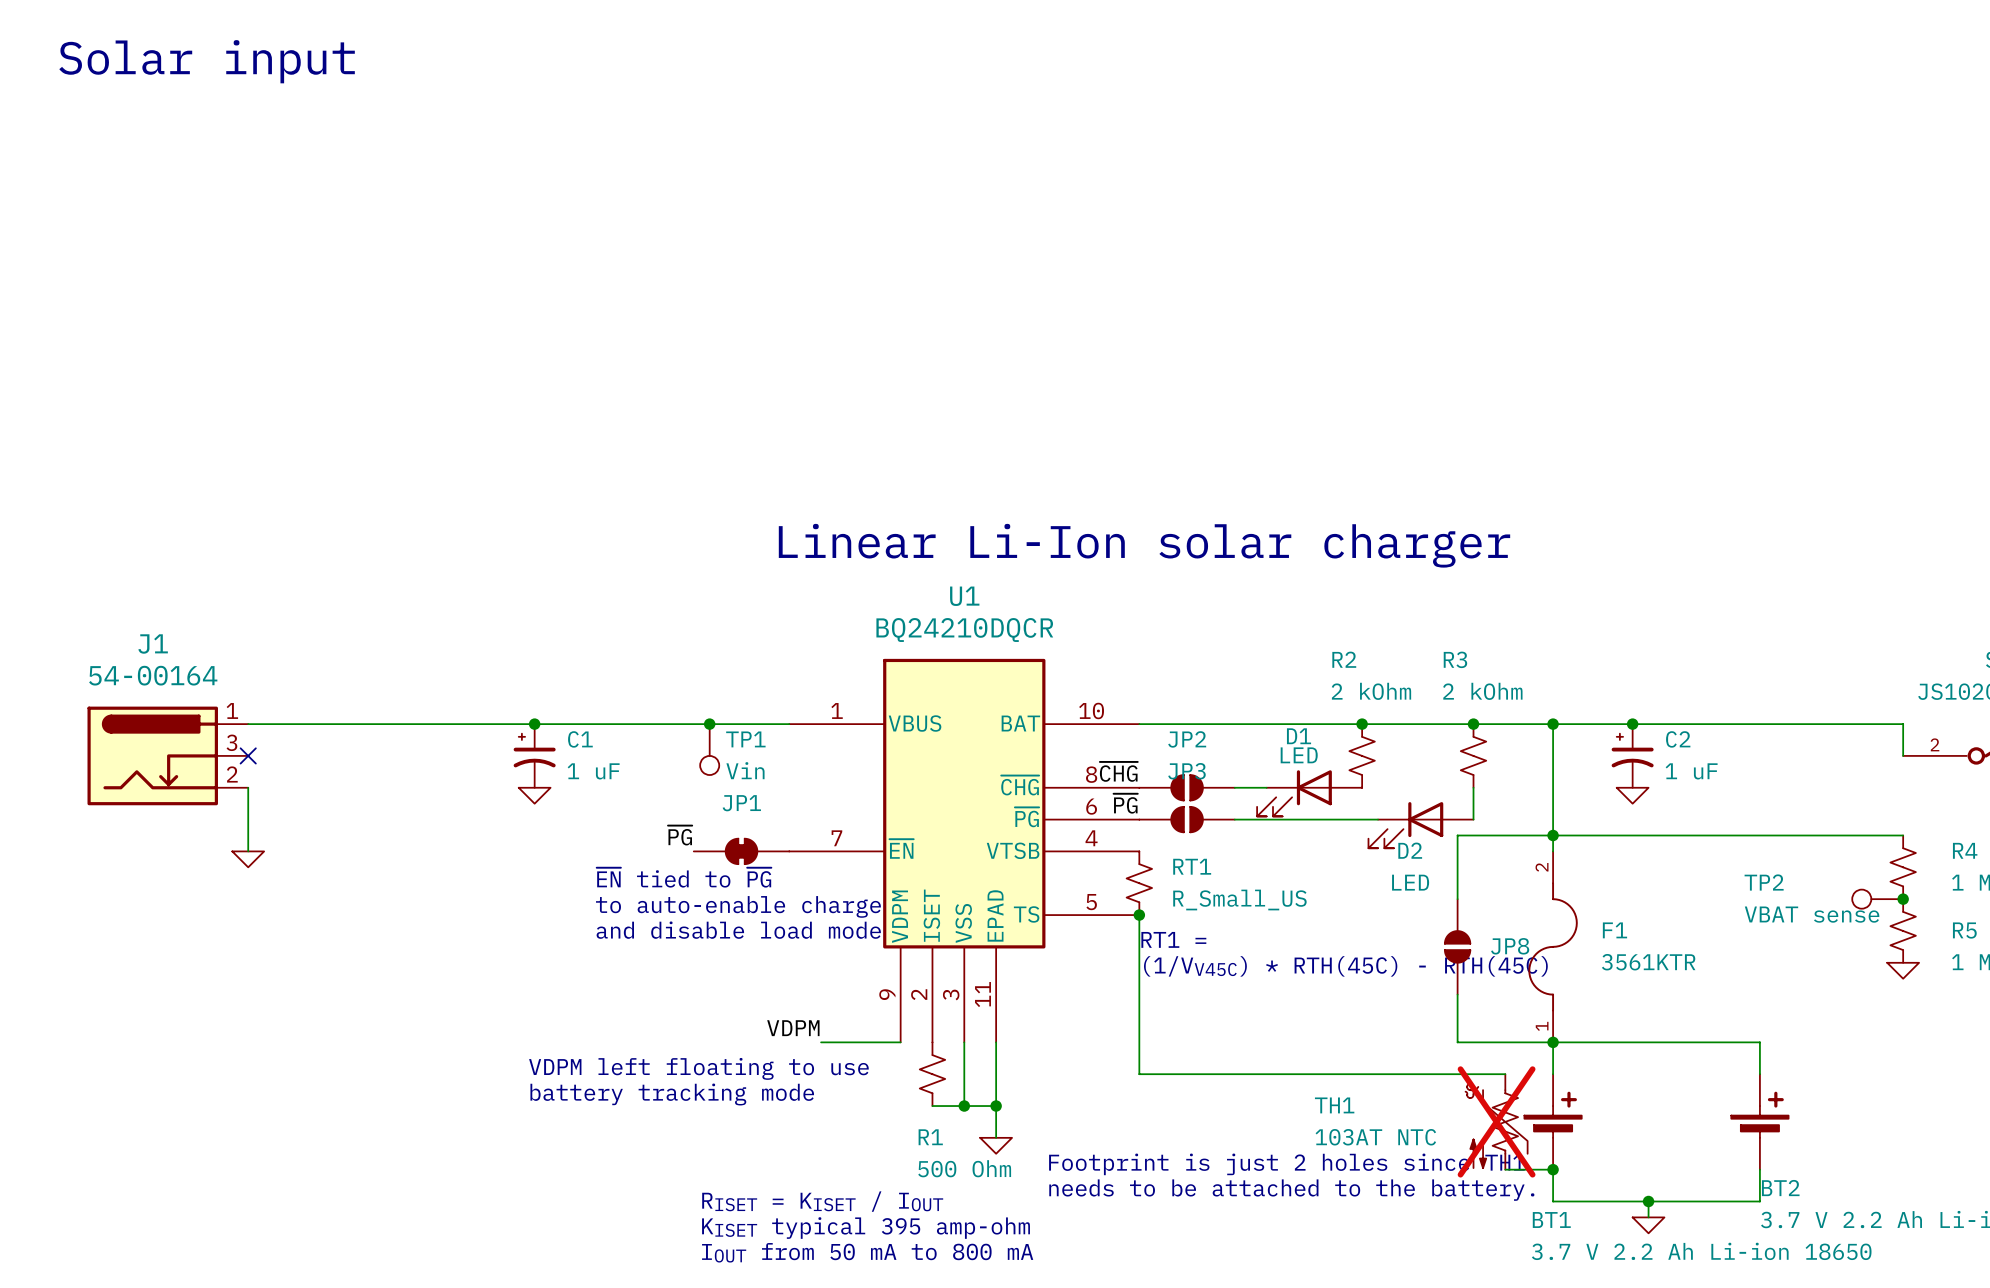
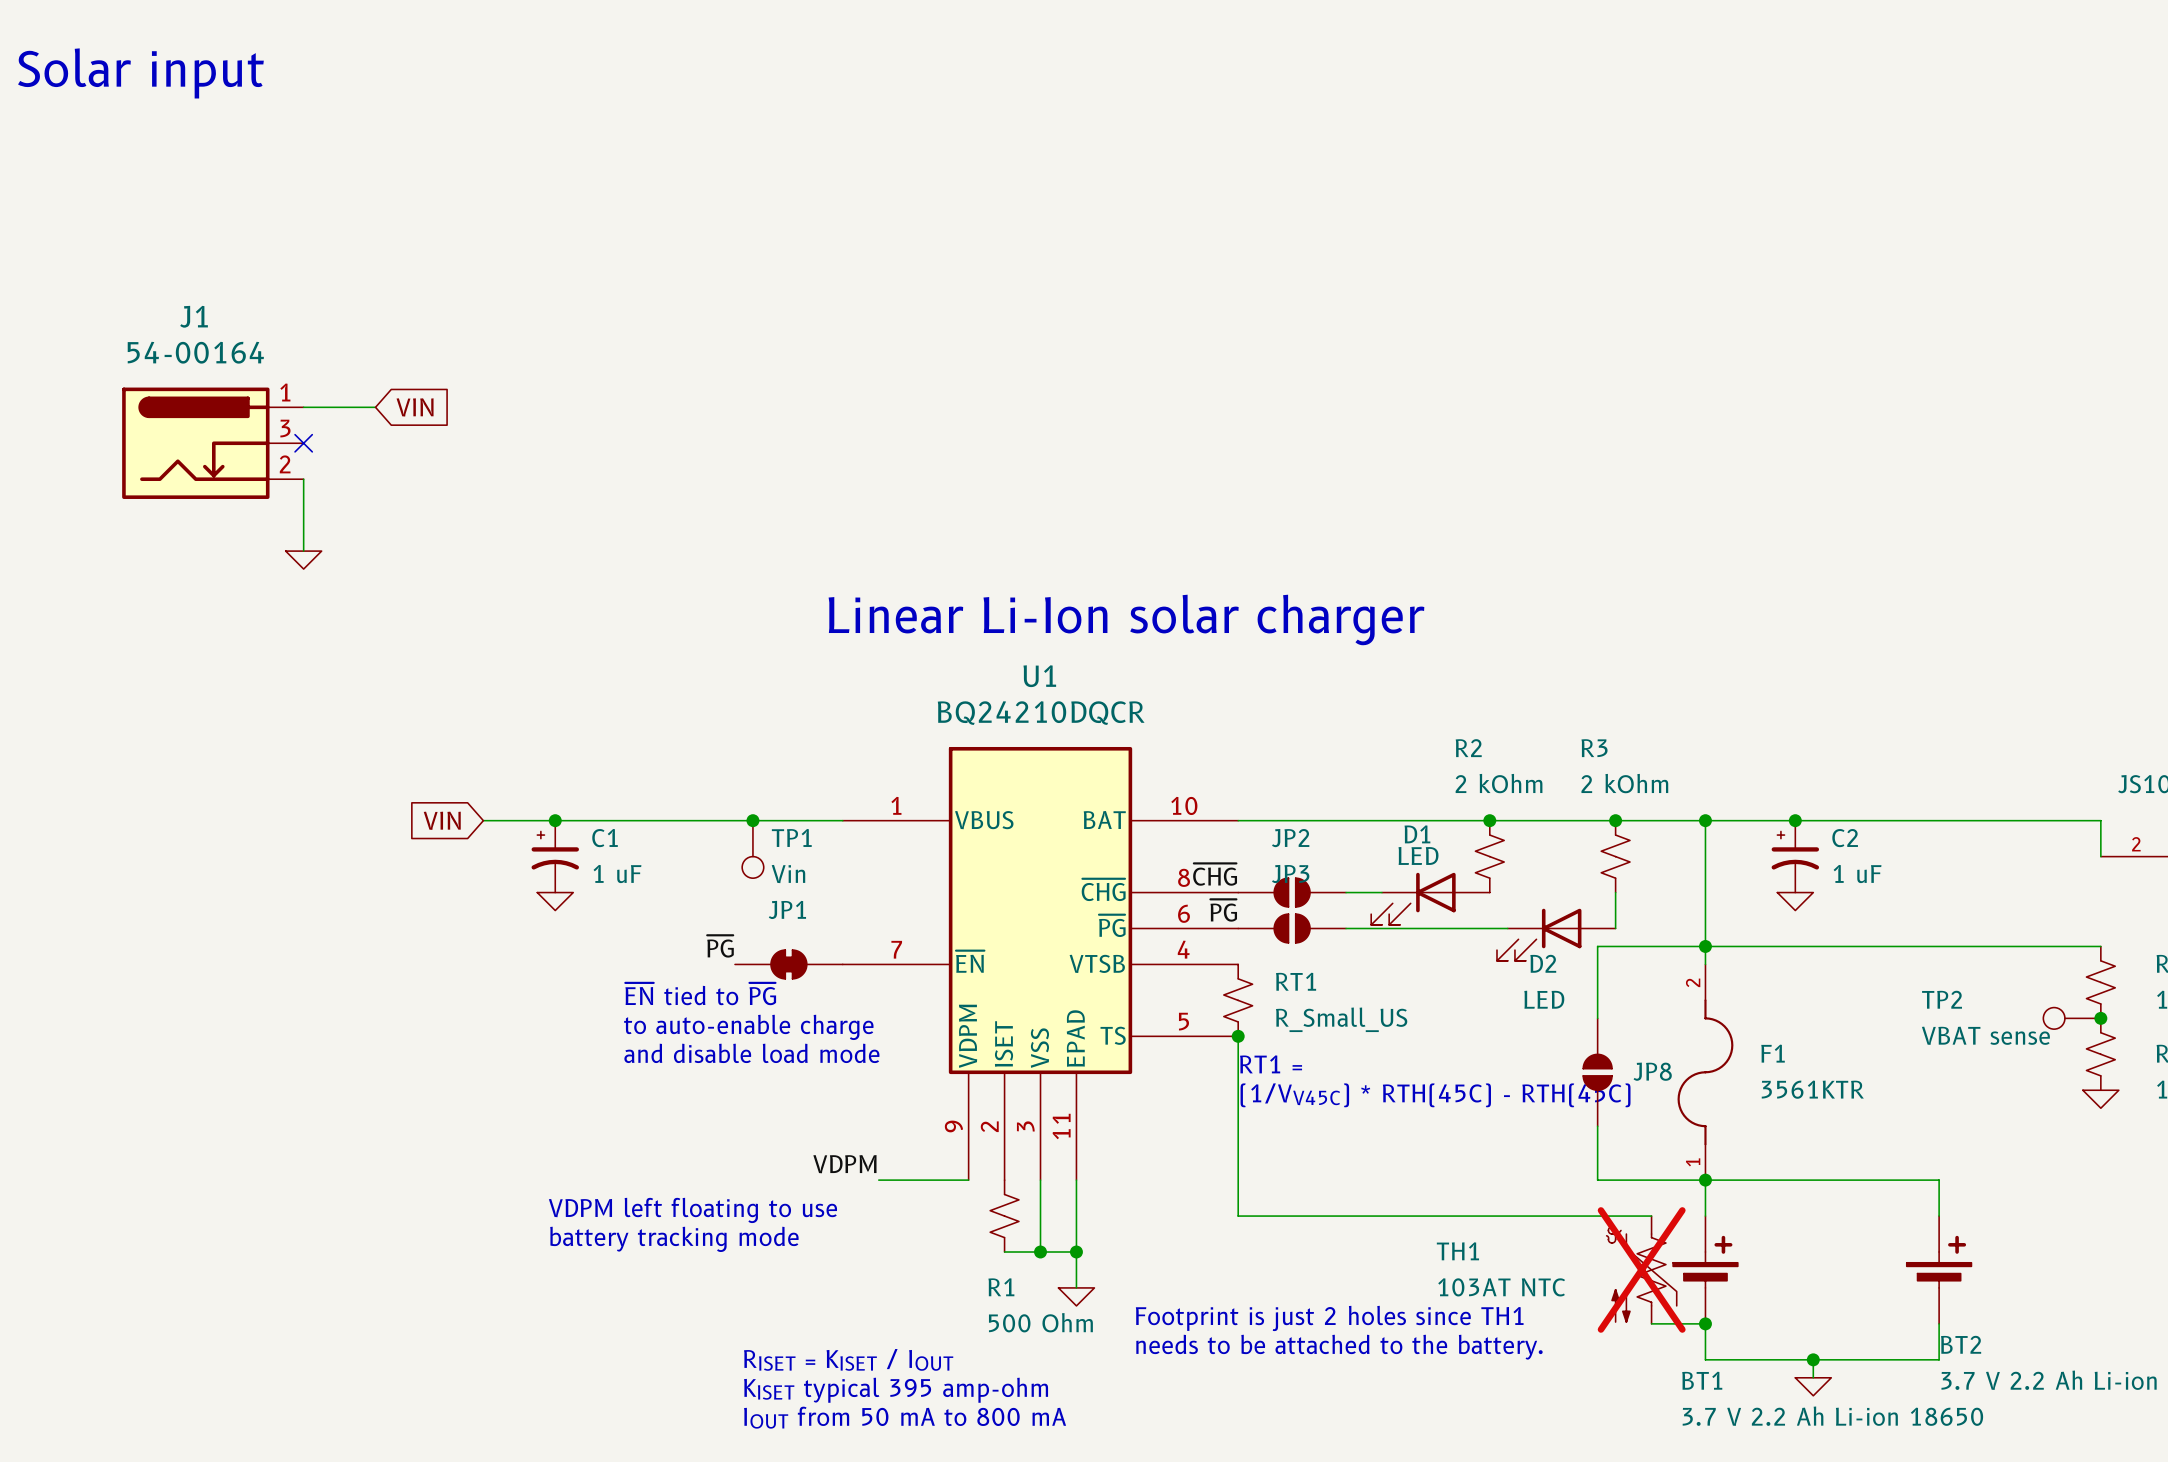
wire: none -> (303, 407) (375, 407)
global label: none -> VIN (415, 407)
no-connect mark: none -> (303, 443)
wire: none -> (303, 479) (303, 551)
power symbol: none -> (303, 560)
wire: (248, 724) (471, 724) -> none
global label: none -> VIN (442, 820)
J1 position: (167, 755) -> (212, 443)
no-connect mark: (248, 755) -> none
wire: (248, 787) (248, 851) -> none
power symbol: (248, 859) -> none

